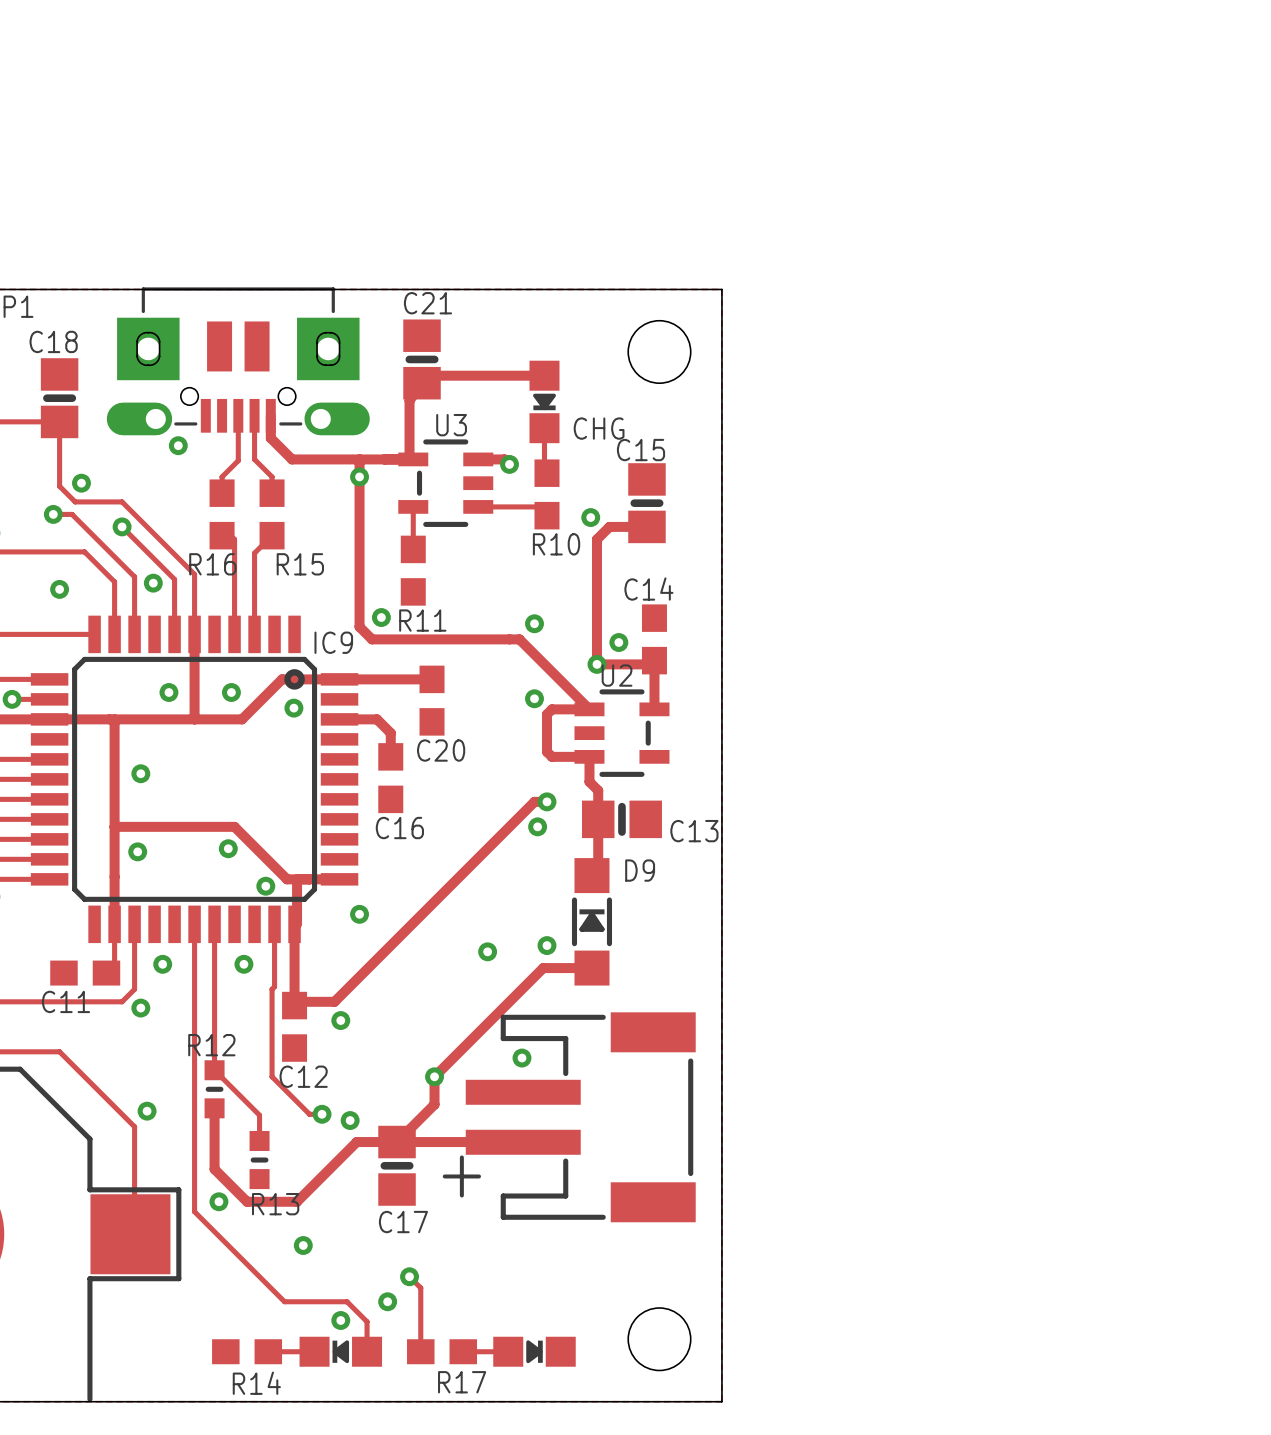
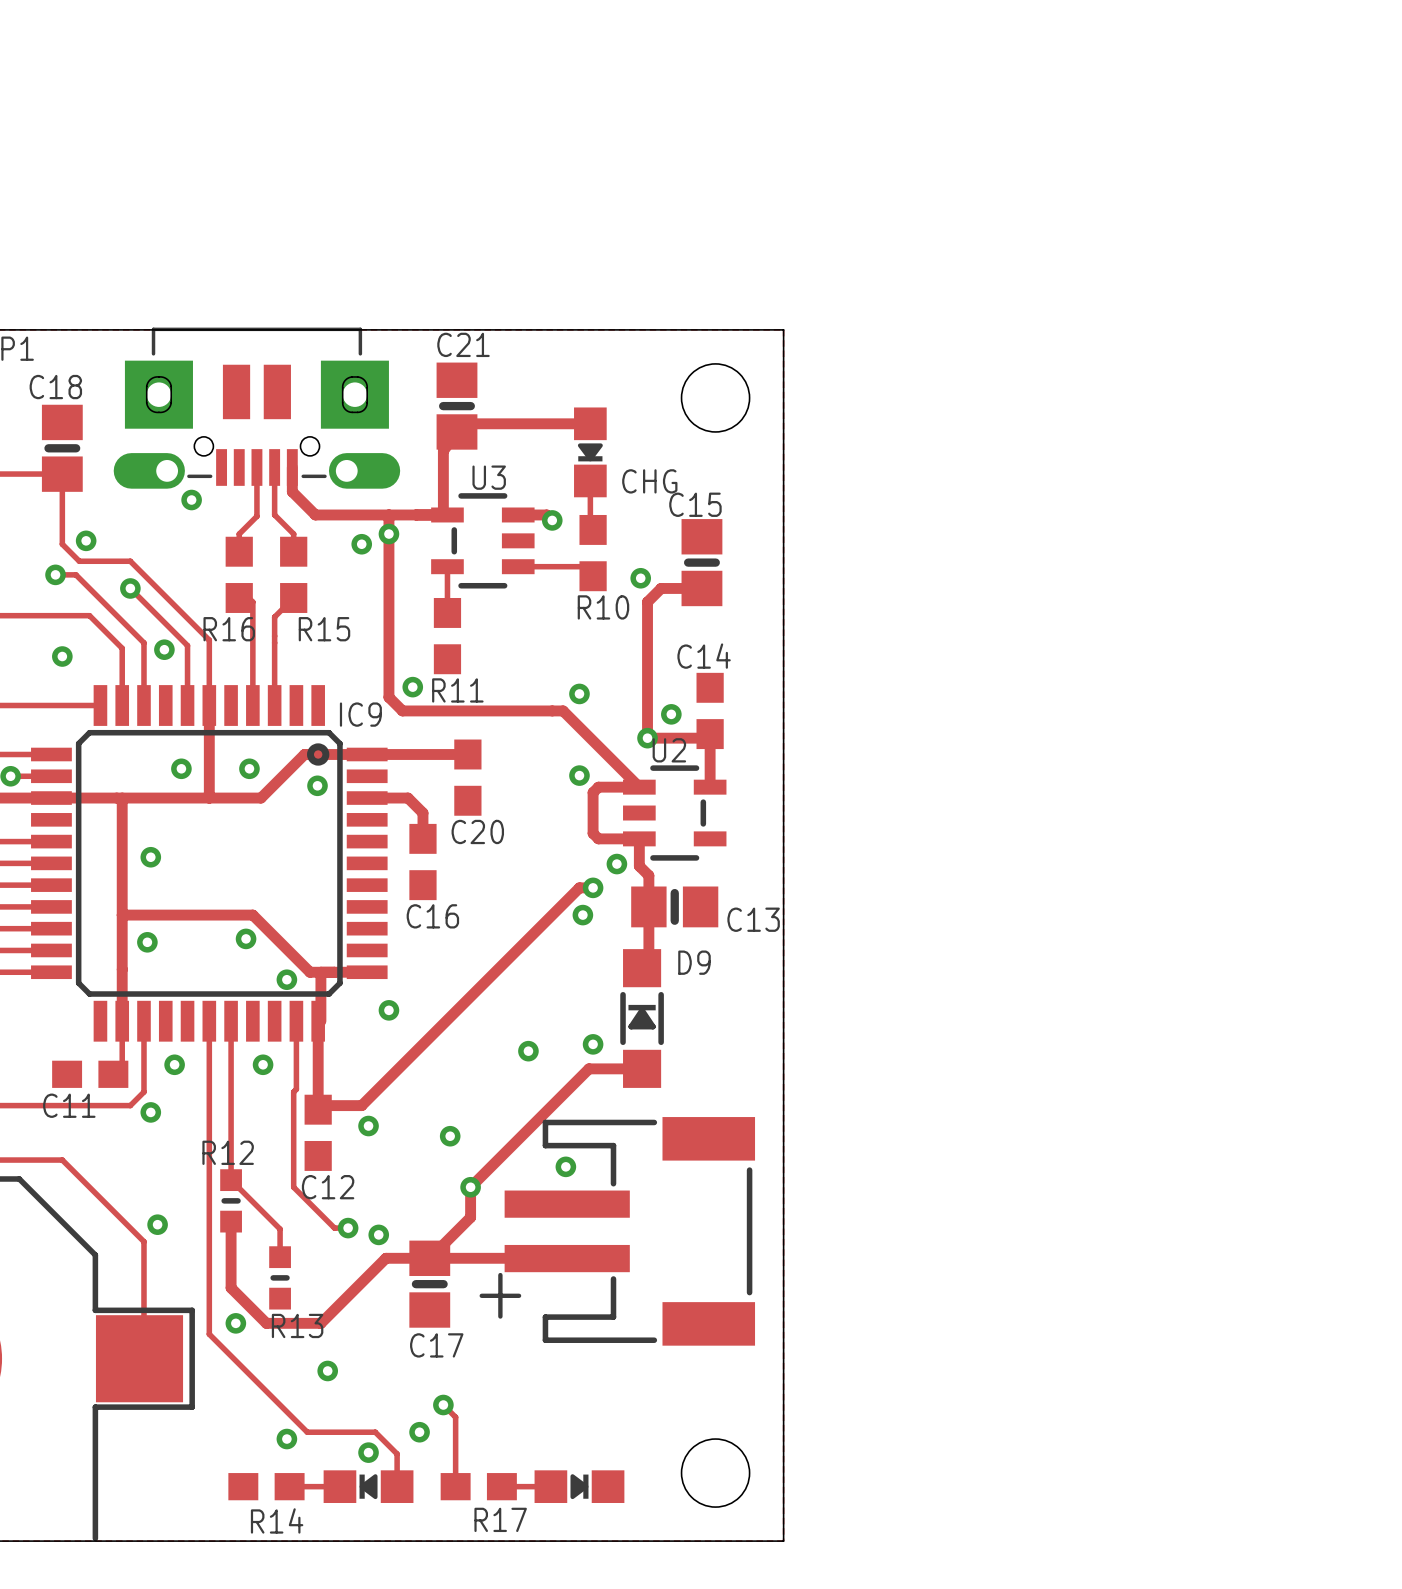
via: none -> (361, 544)
via: none -> (616, 864)
via: none -> (450, 1136)
via: none -> (286, 1439)

